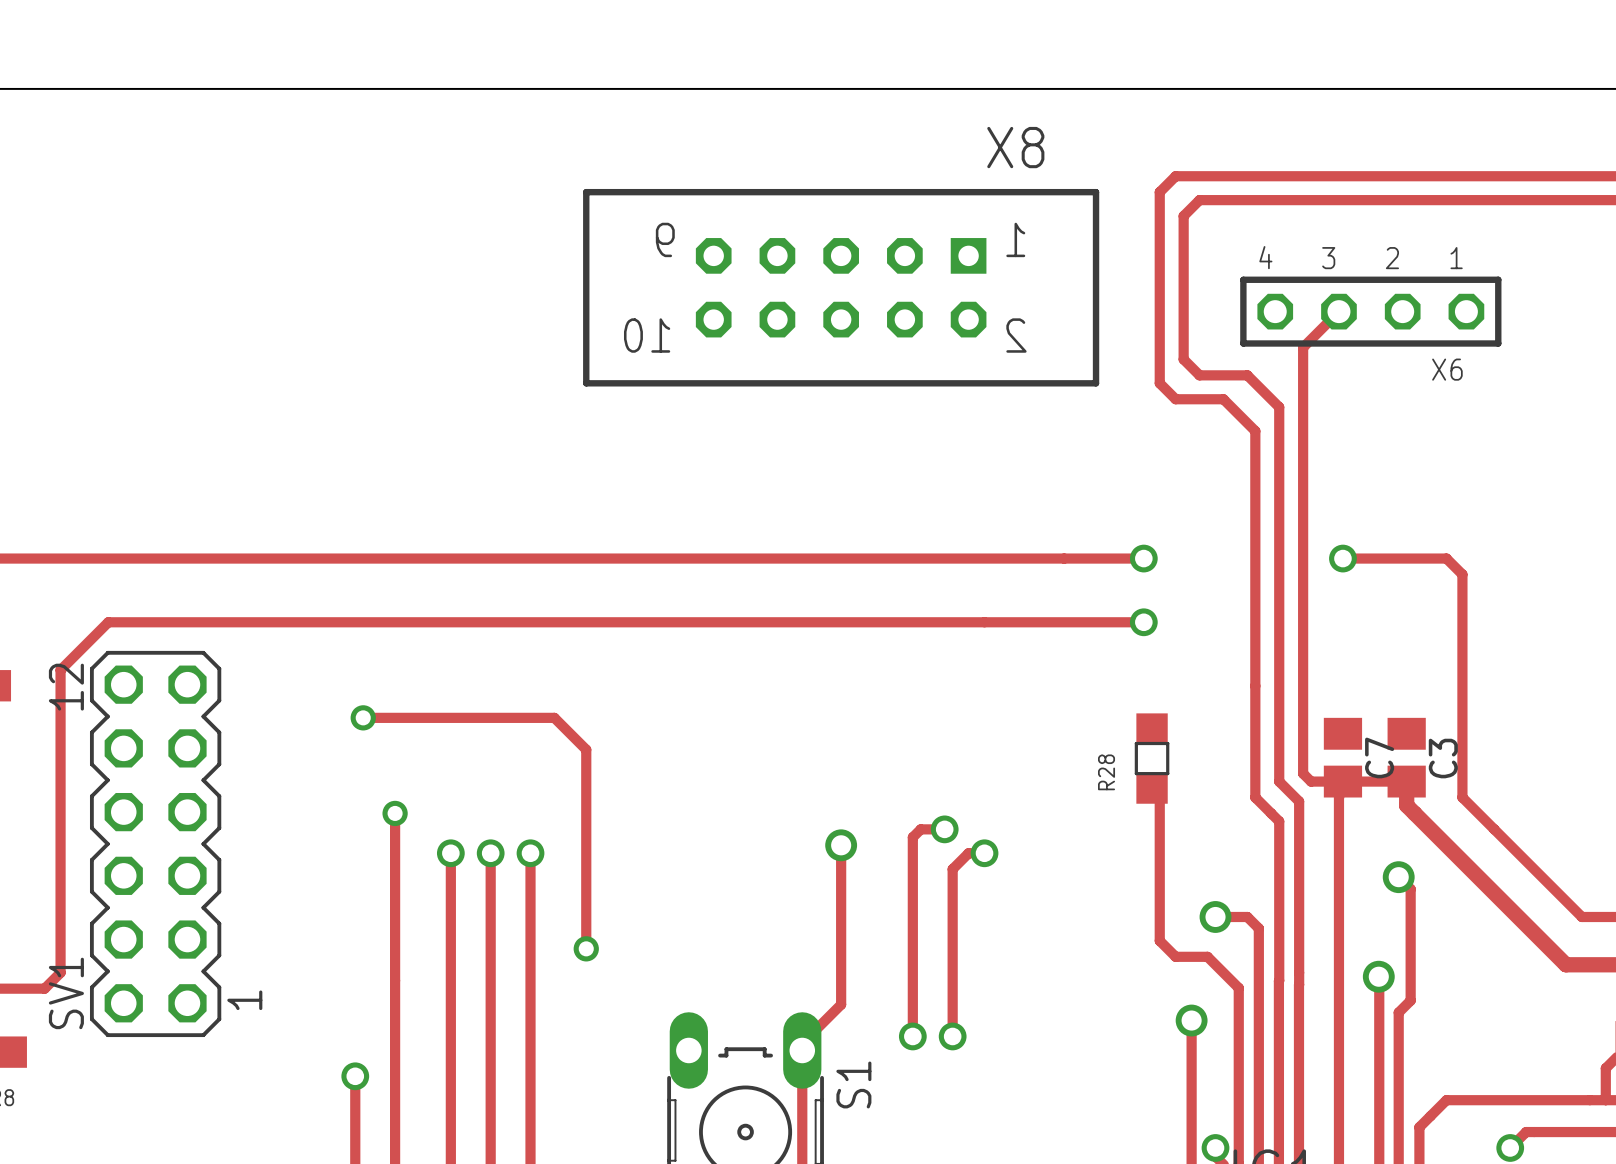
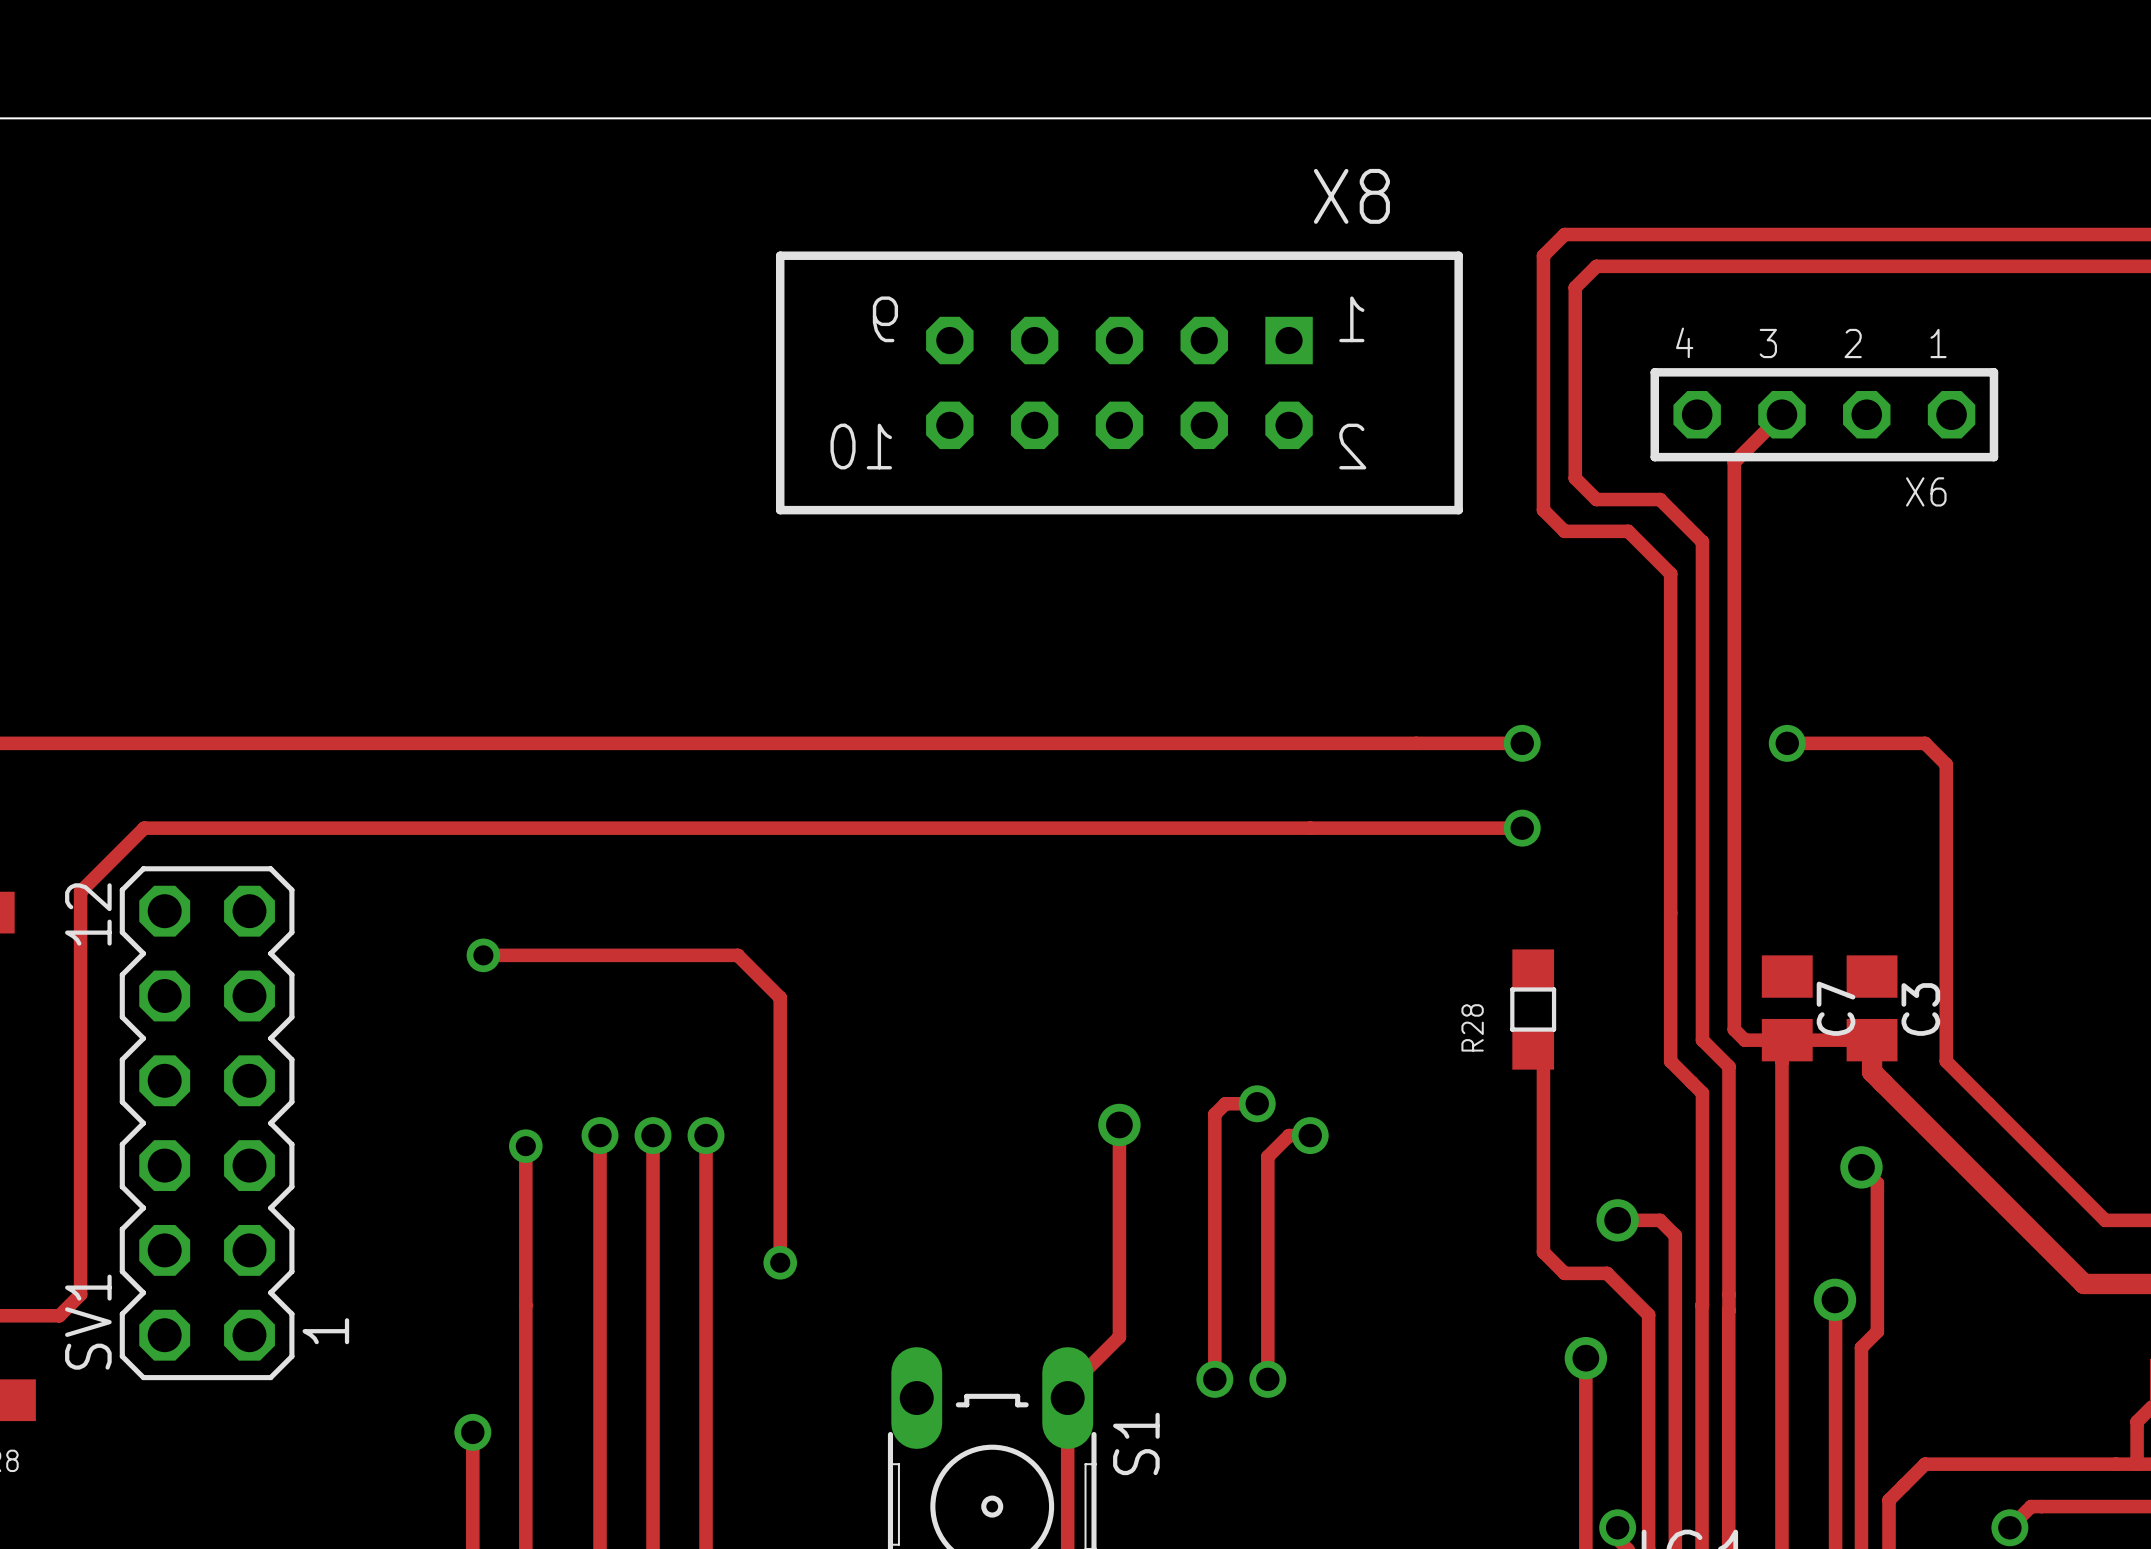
track: (395, 813) (395, 861) -> none
via position: (395, 813) -> (525, 1146)

